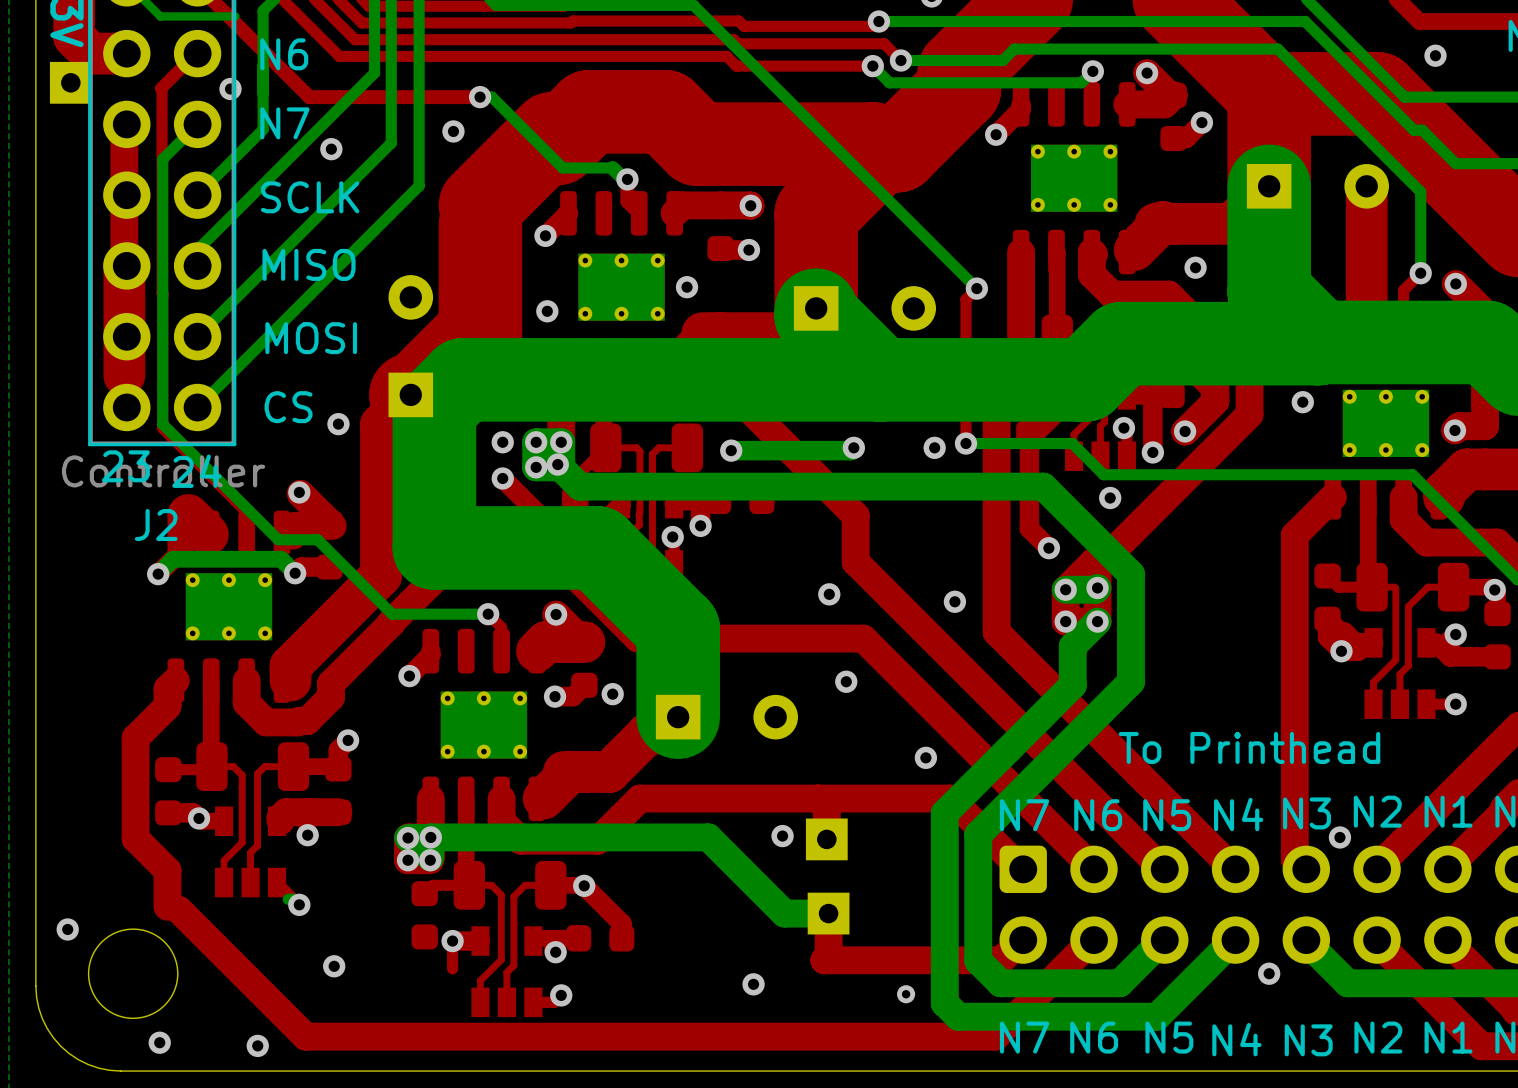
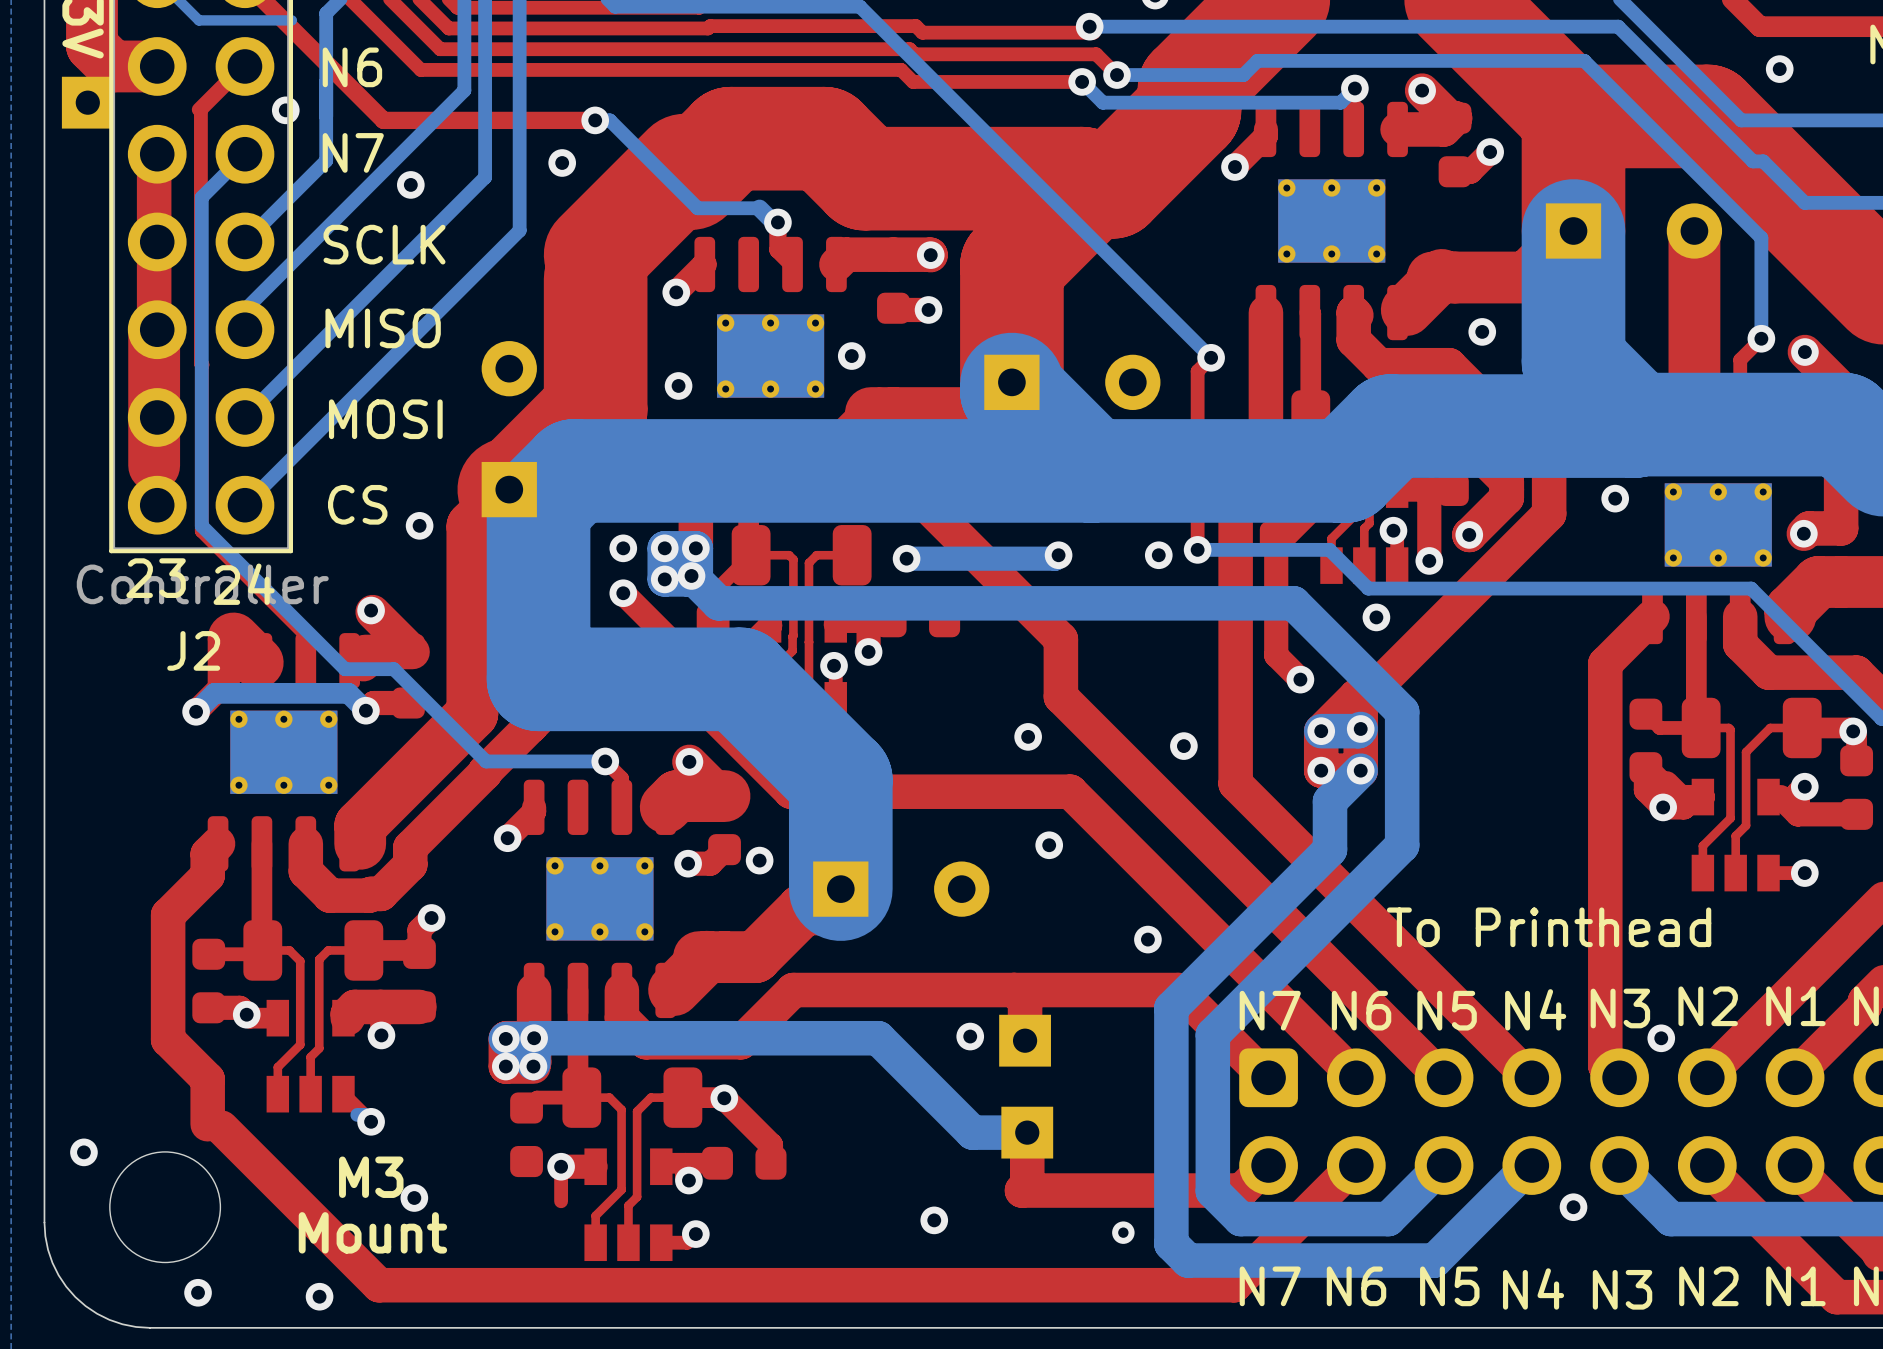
text: none -> M3 (371, 1177)
text: none -> Mount (372, 1232)

